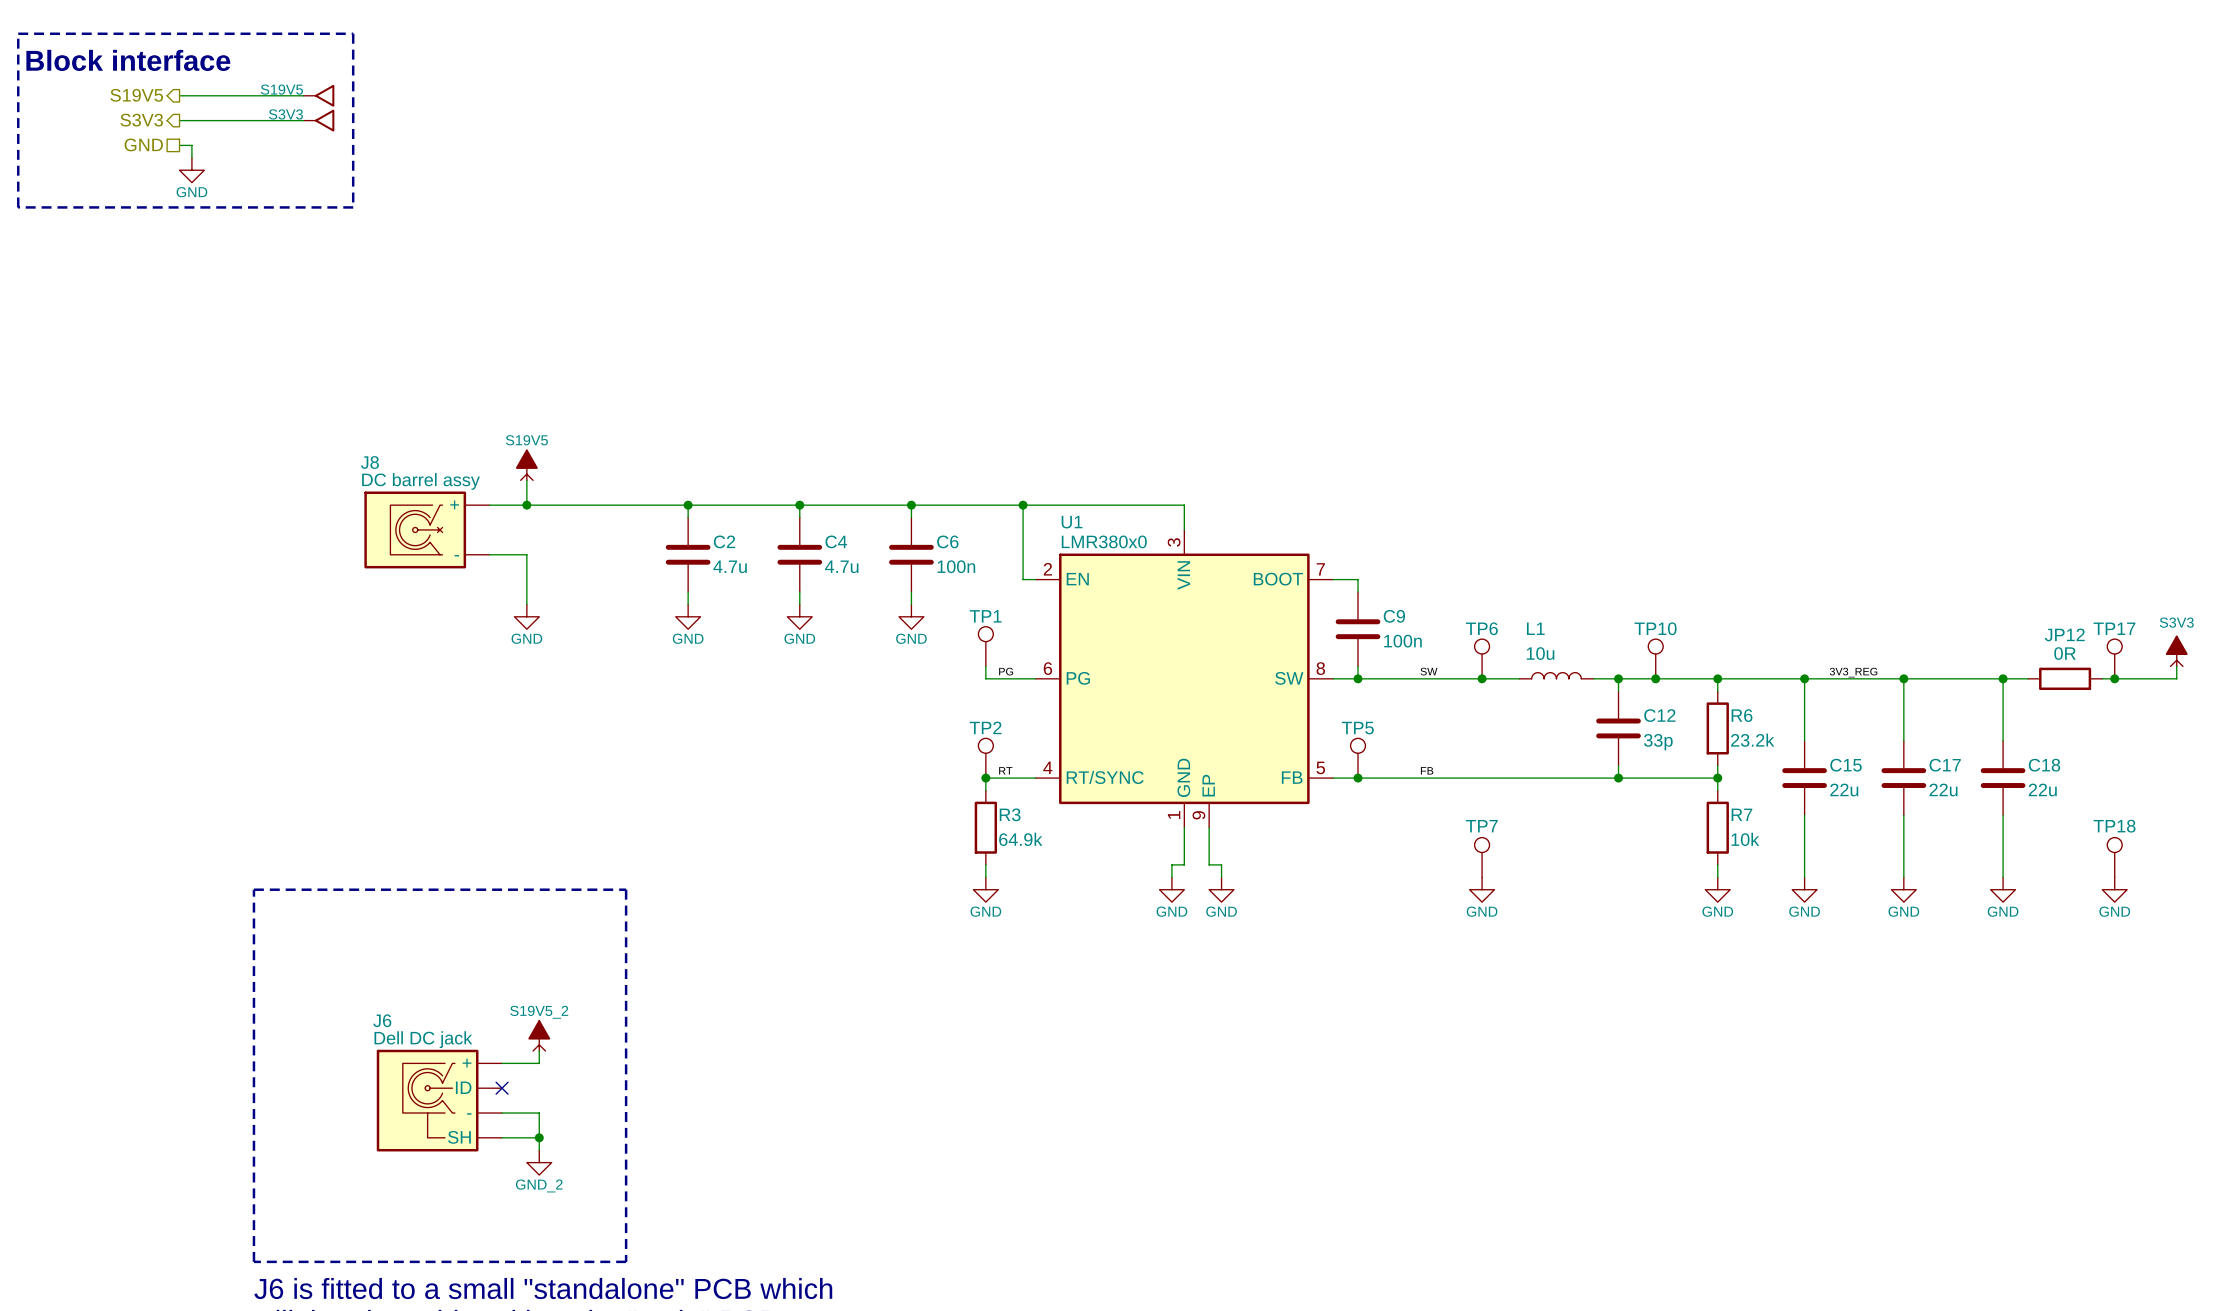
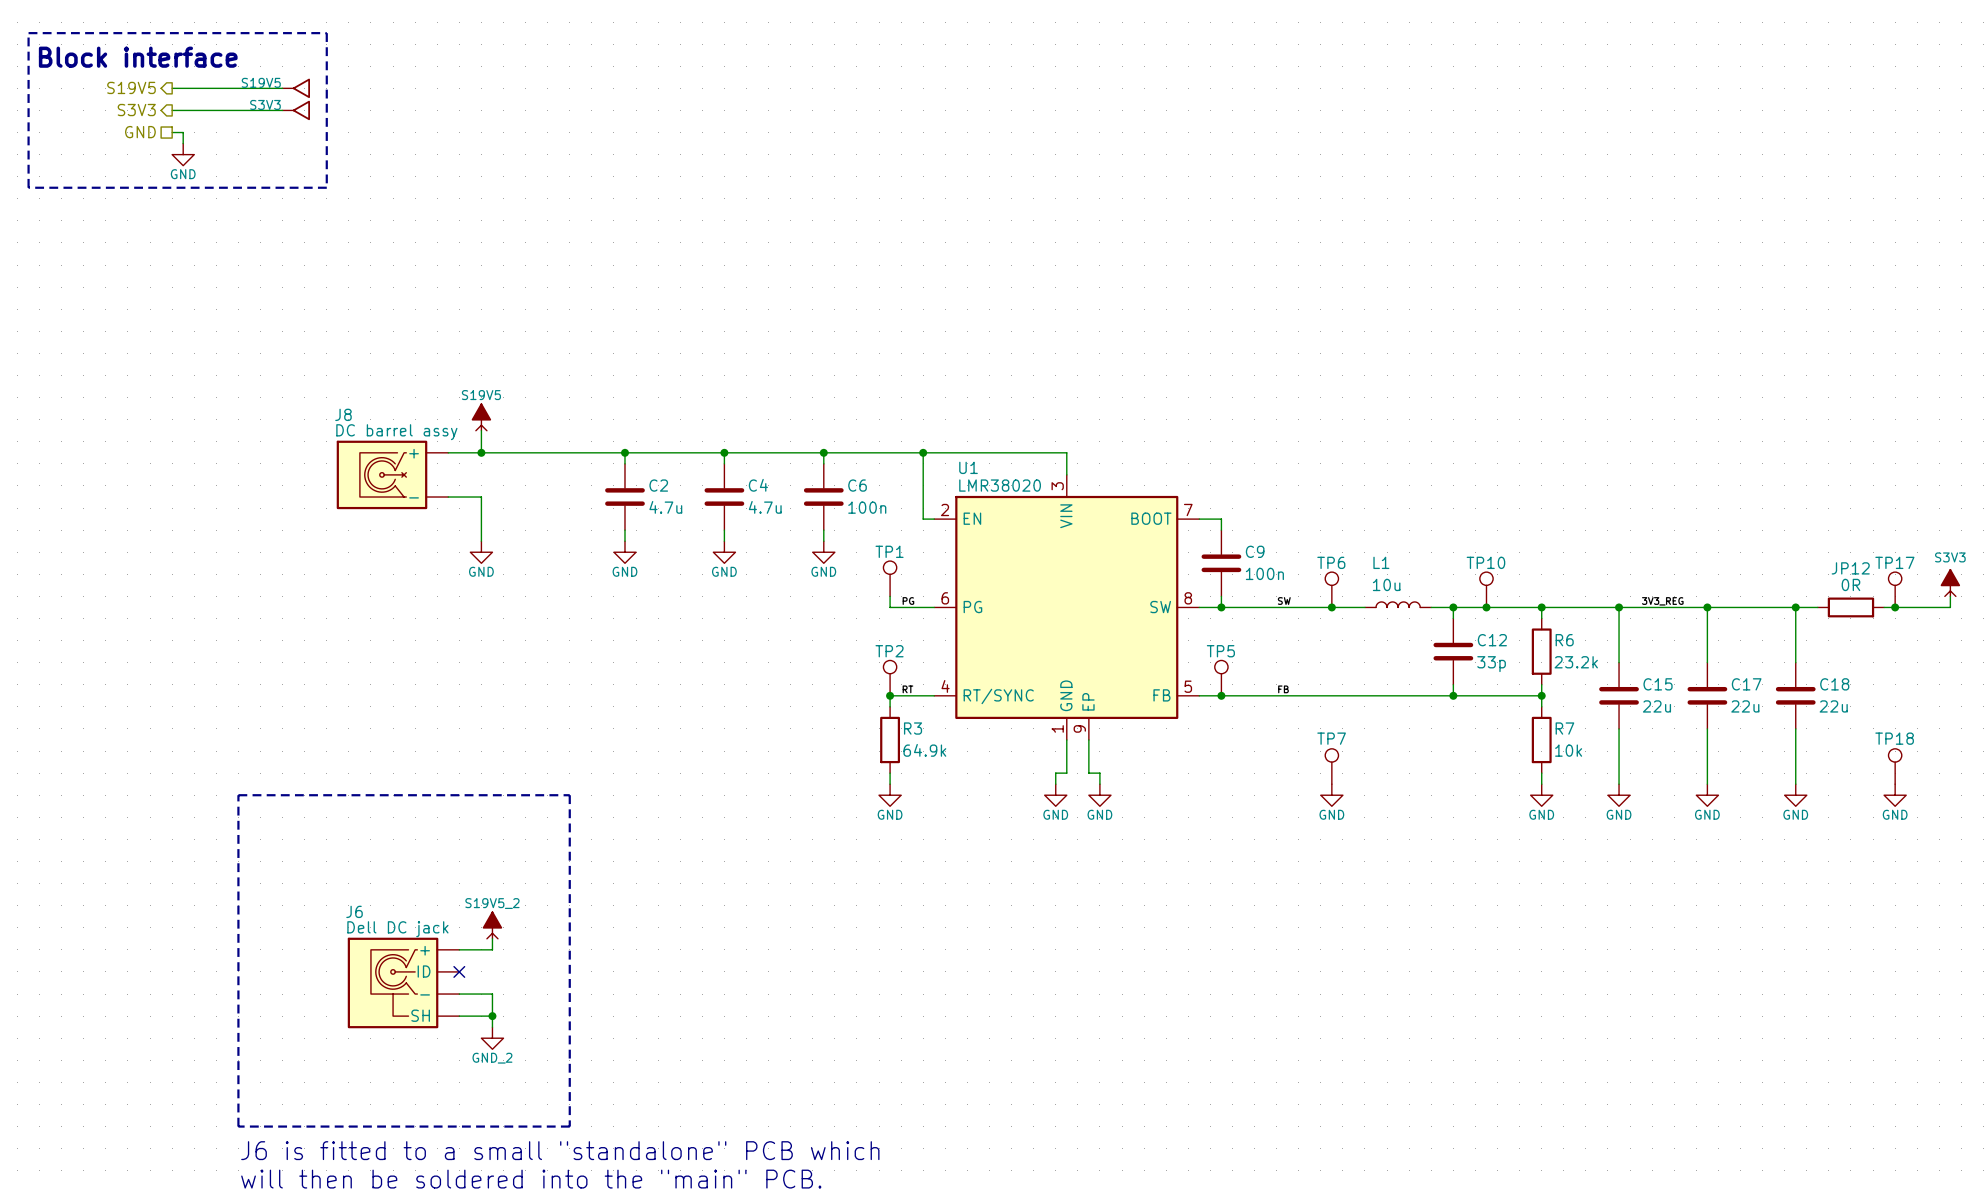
U1 value: LMR380x0 (1104, 541) -> LMR38020 (1000, 485)

